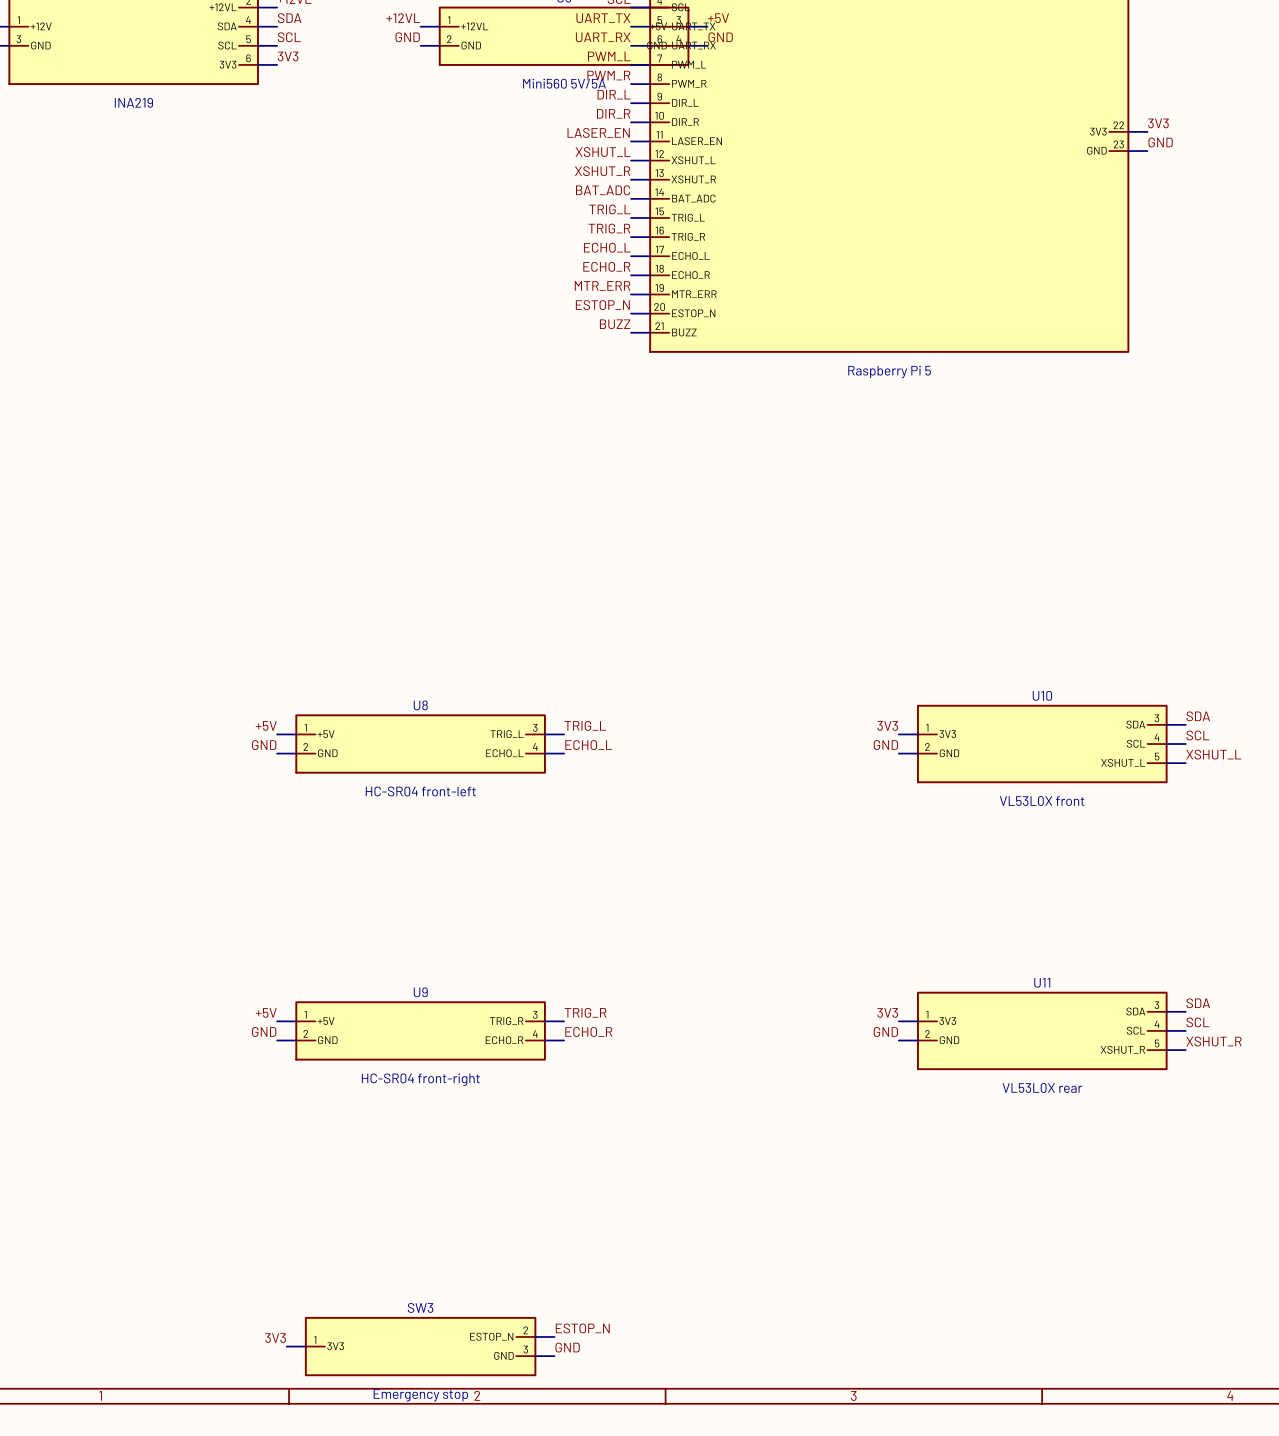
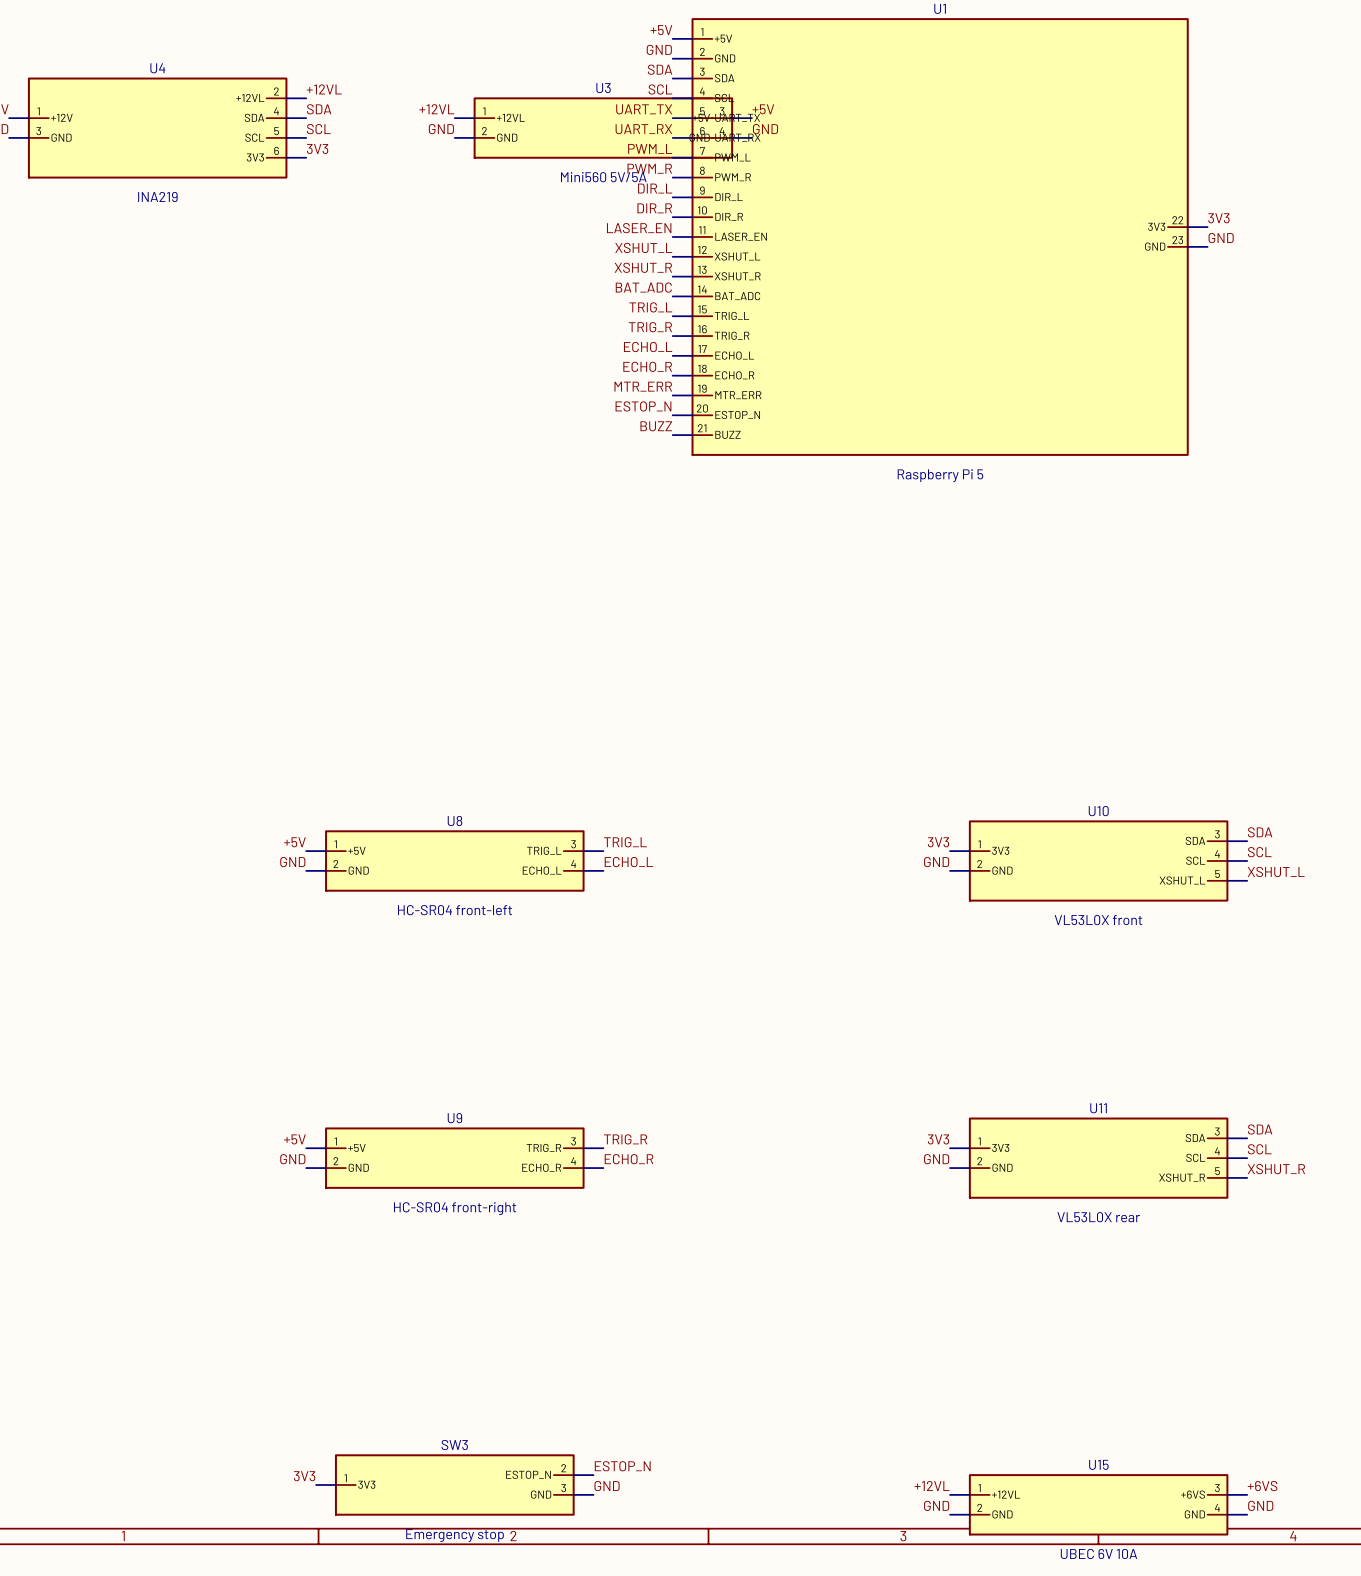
label: none -> +12VL (932, 1486)
label: none -> +6VS (1262, 1486)
wire: none -> (950, 1494) (969, 1494)
wire: none -> (1227, 1494) (1247, 1494)
U15: none -> UBEC 6V 10A (1098, 1504)
label: none -> GND (936, 1505)
label: none -> GND (1260, 1505)
wire: none -> (950, 1514) (969, 1514)
wire: none -> (1227, 1514) (1247, 1514)

